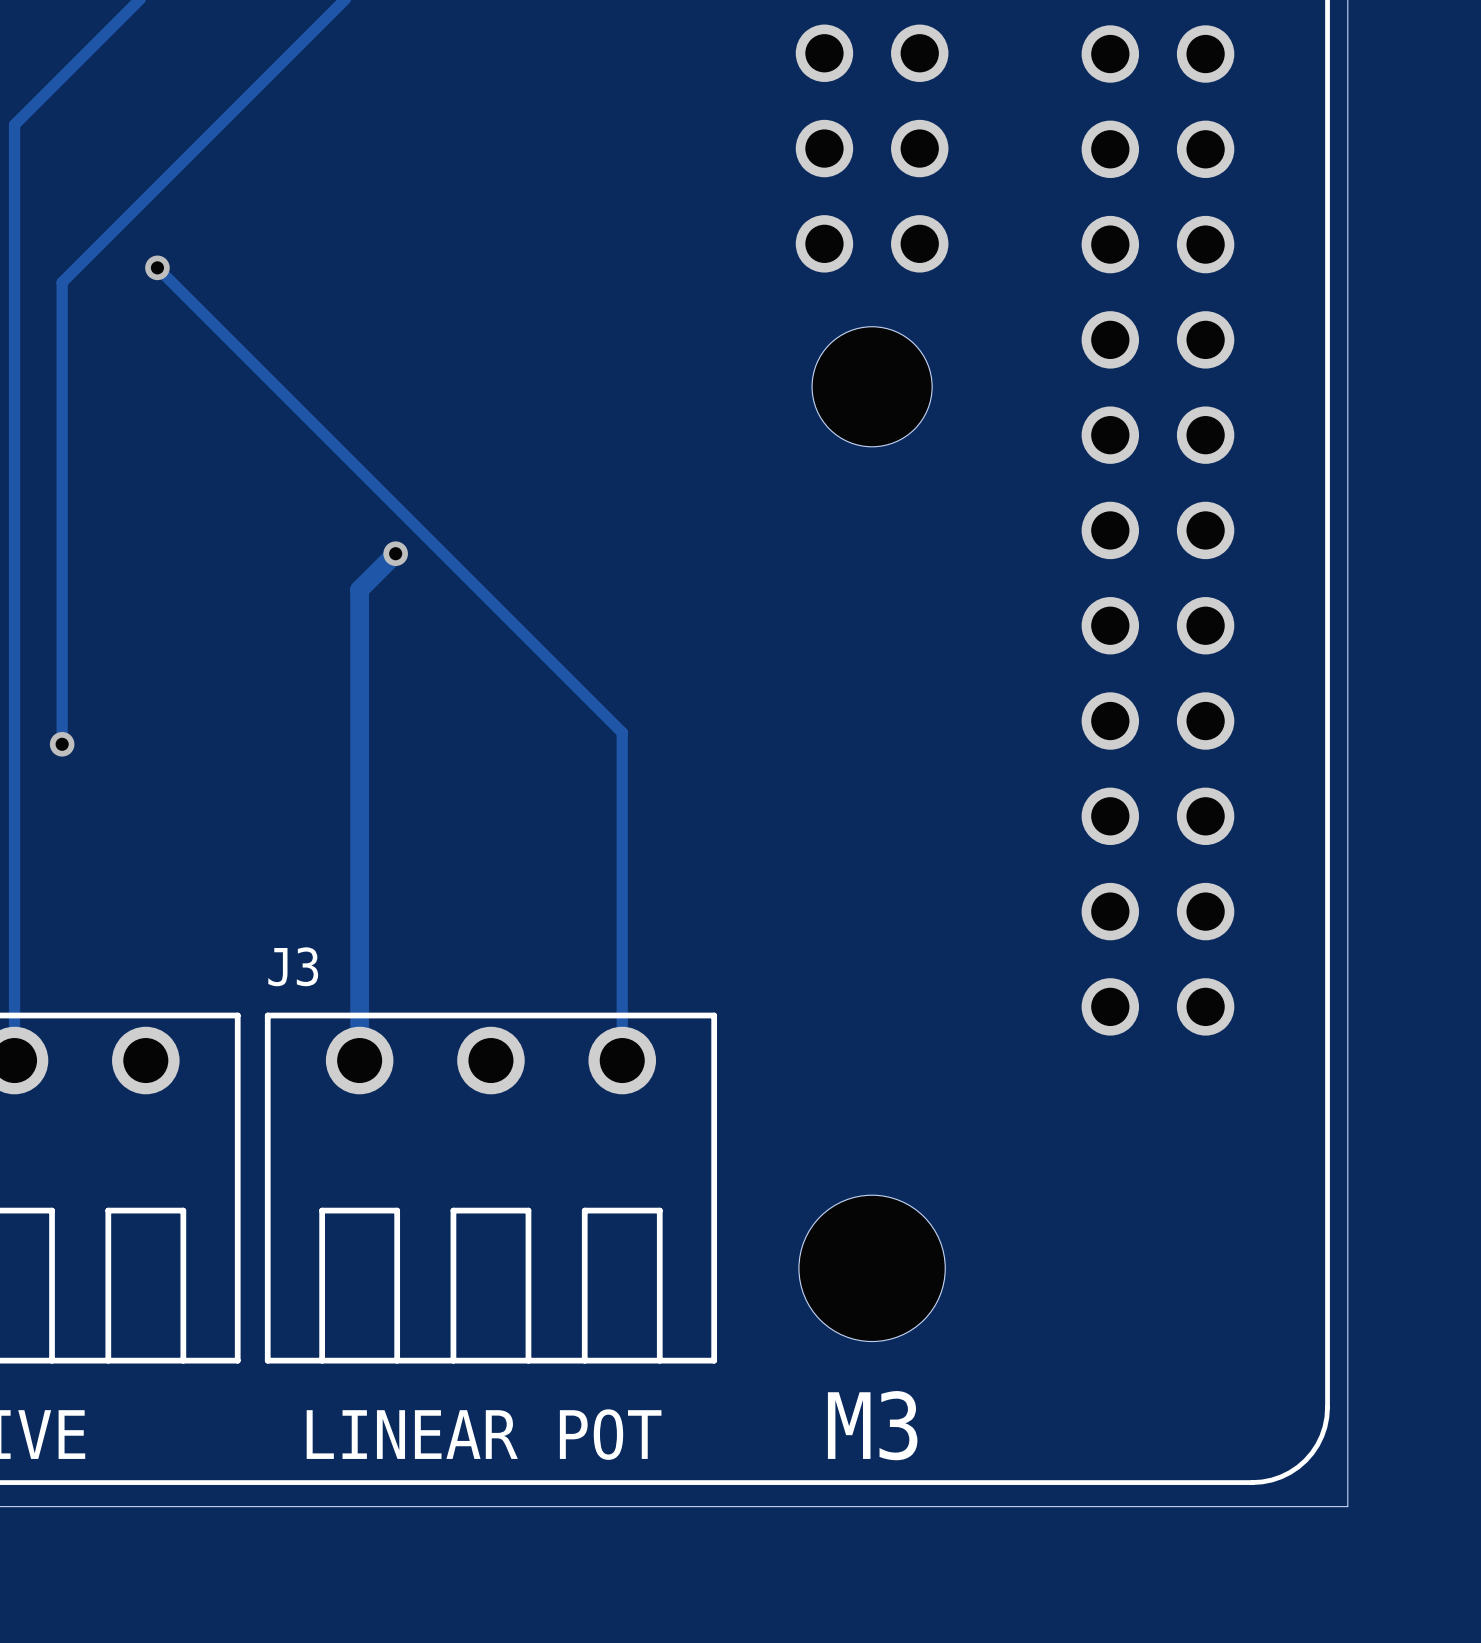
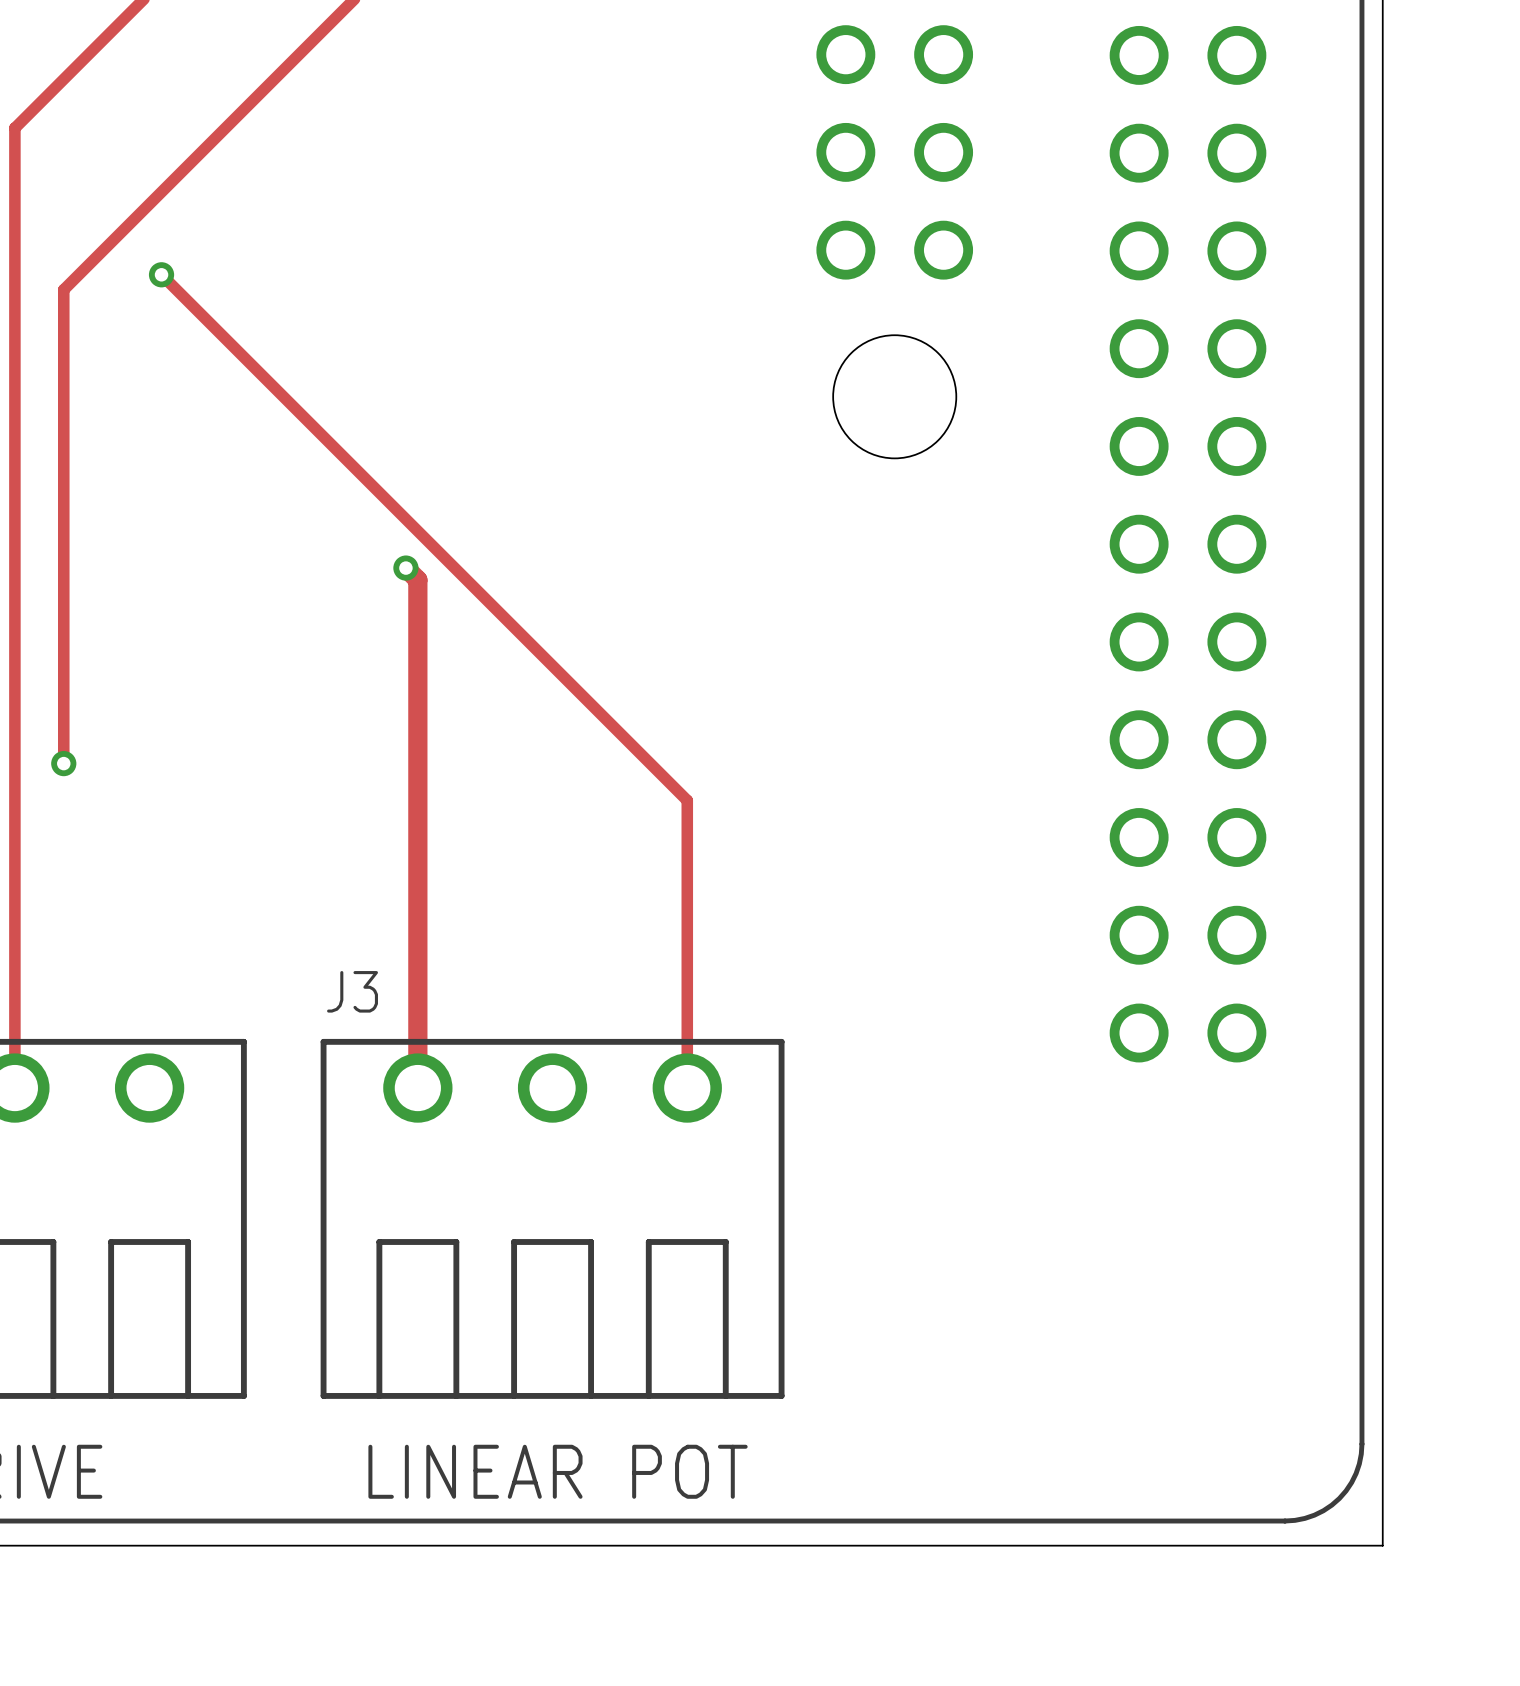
track: (395, 553) (359, 589) (359, 1060) -> (405, 568) (417, 580) (417, 1088)
track: (622, 732) (622, 1060) -> (638, 751) (687, 800) (687, 1088)
J3 position: (490, 1188) -> (552, 1218)
part: (872, 1268) -> none
text: M3 (872, 1425) -> none
text position: LINEAR POT (484, 1434) -> LINEAR POT (558, 1471)

